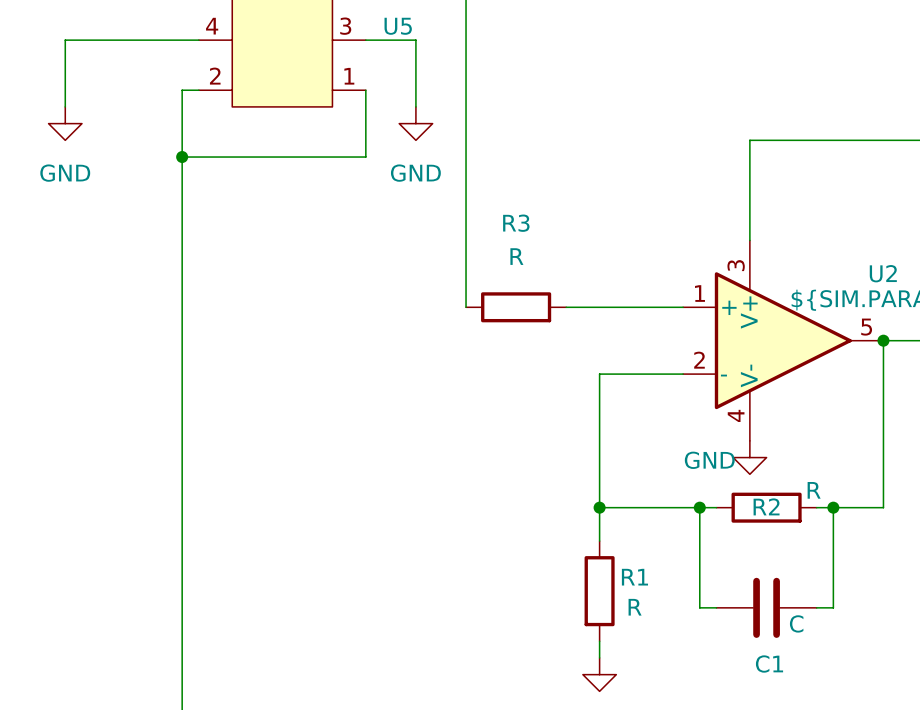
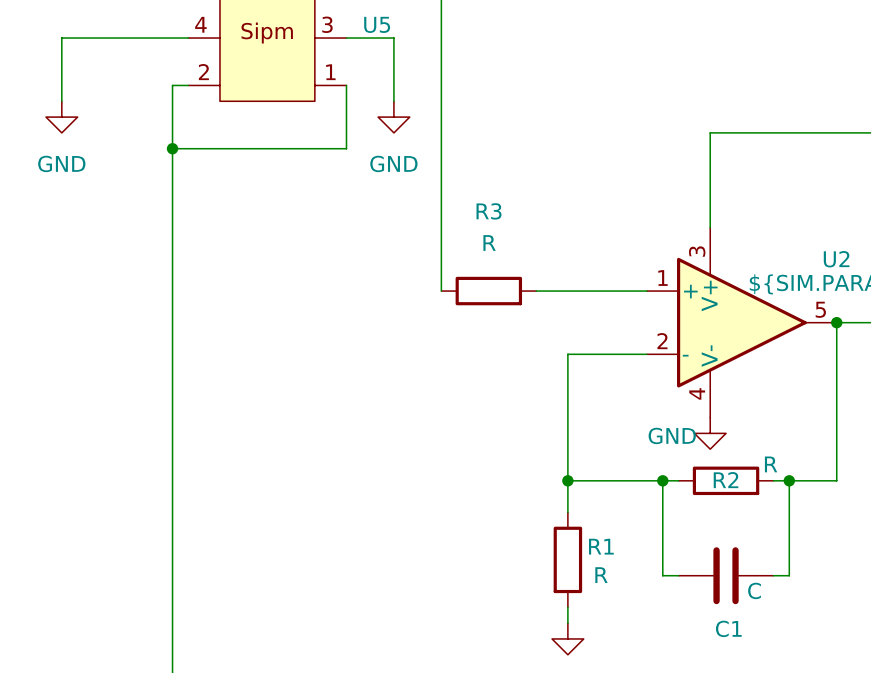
U5 text: none -> Sipm (267, 33)

